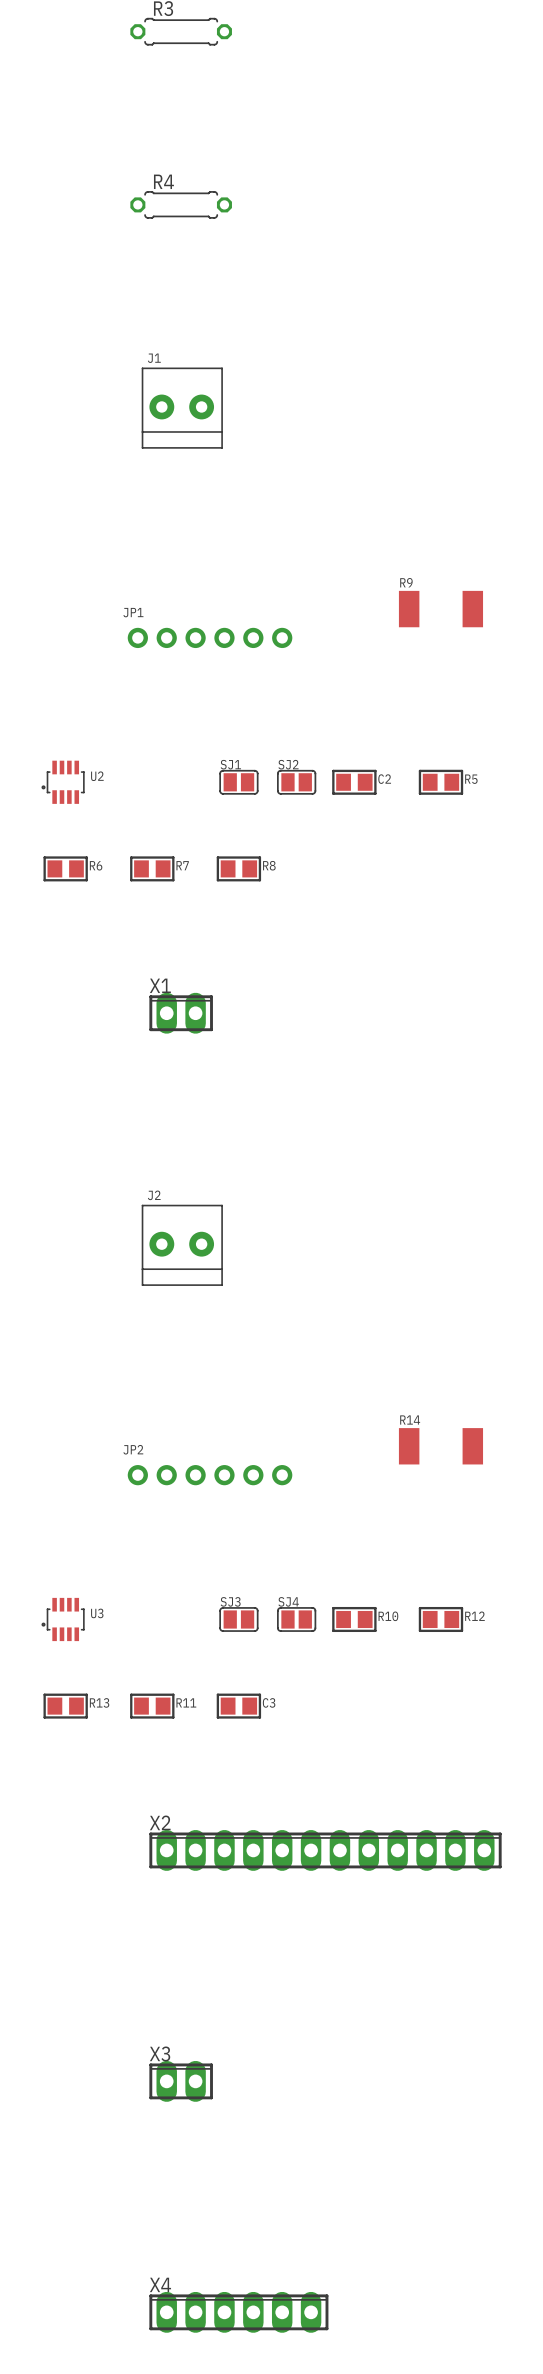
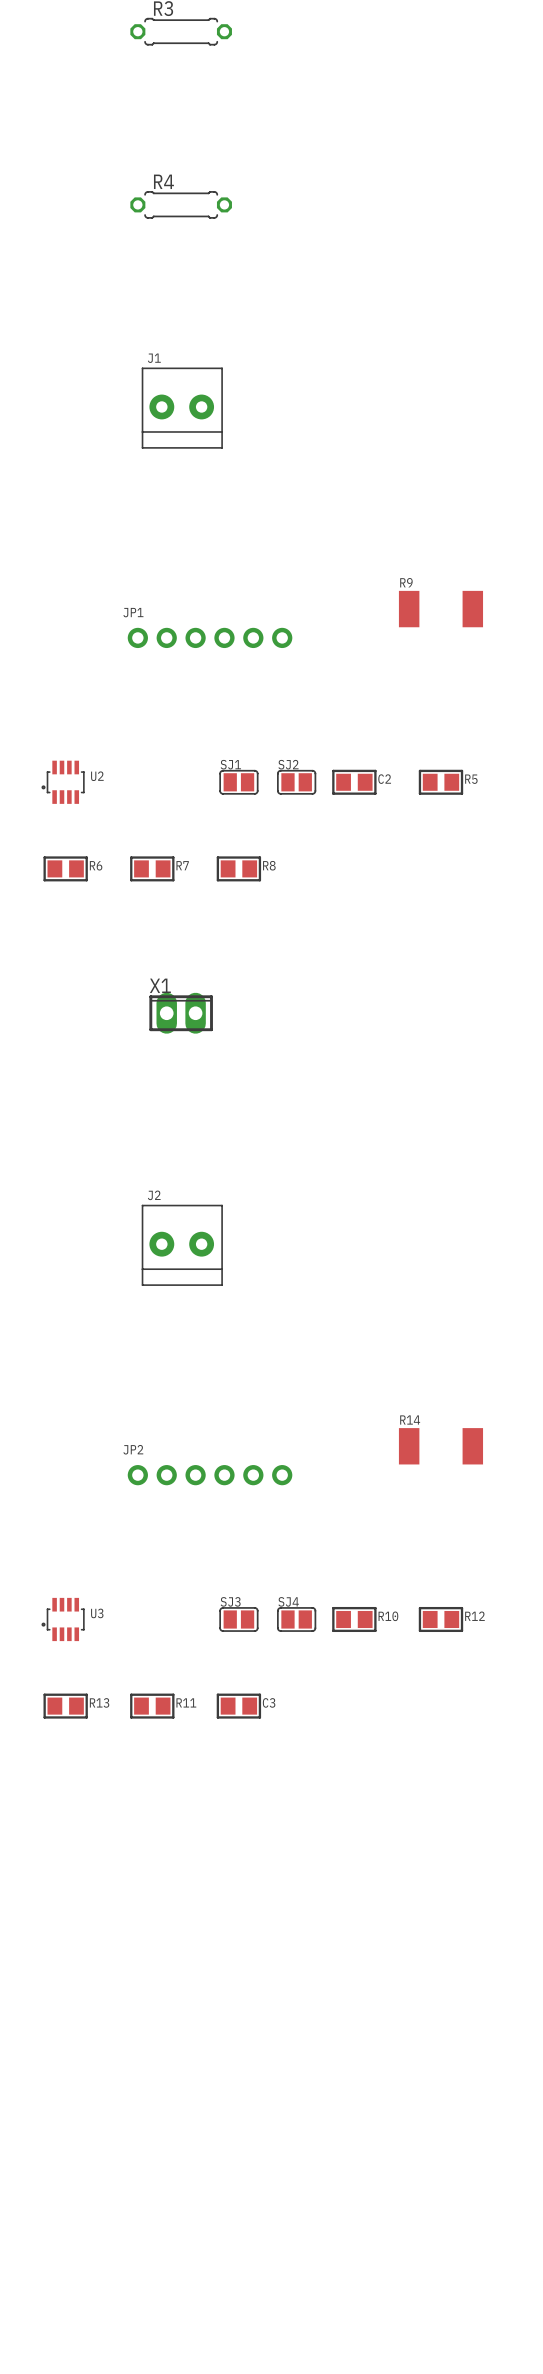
X2: (325, 1850) -> none
X3: (181, 2081) -> none
X4: (238, 2312) -> none

